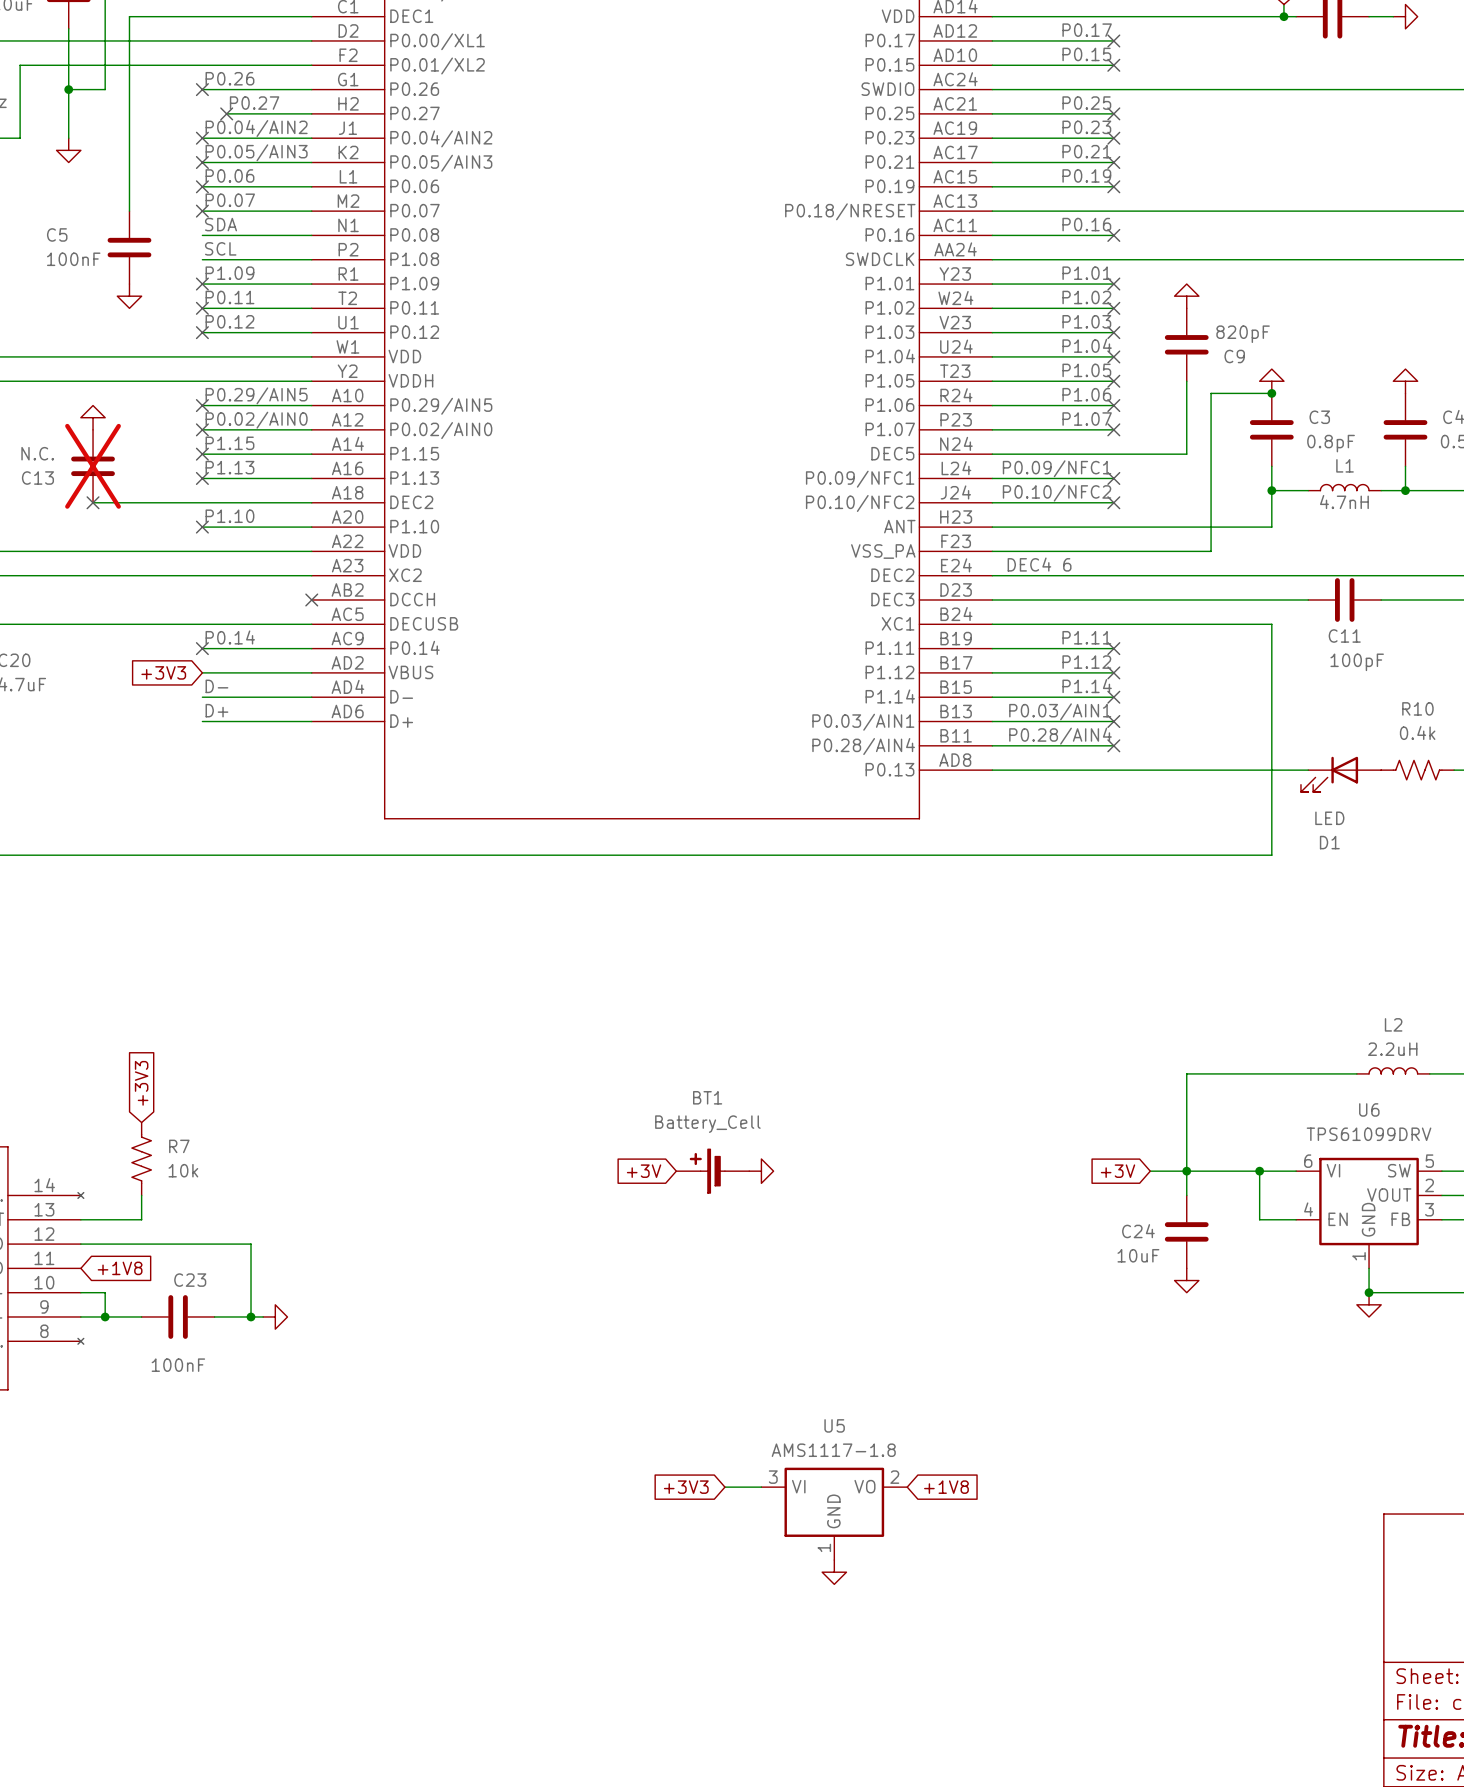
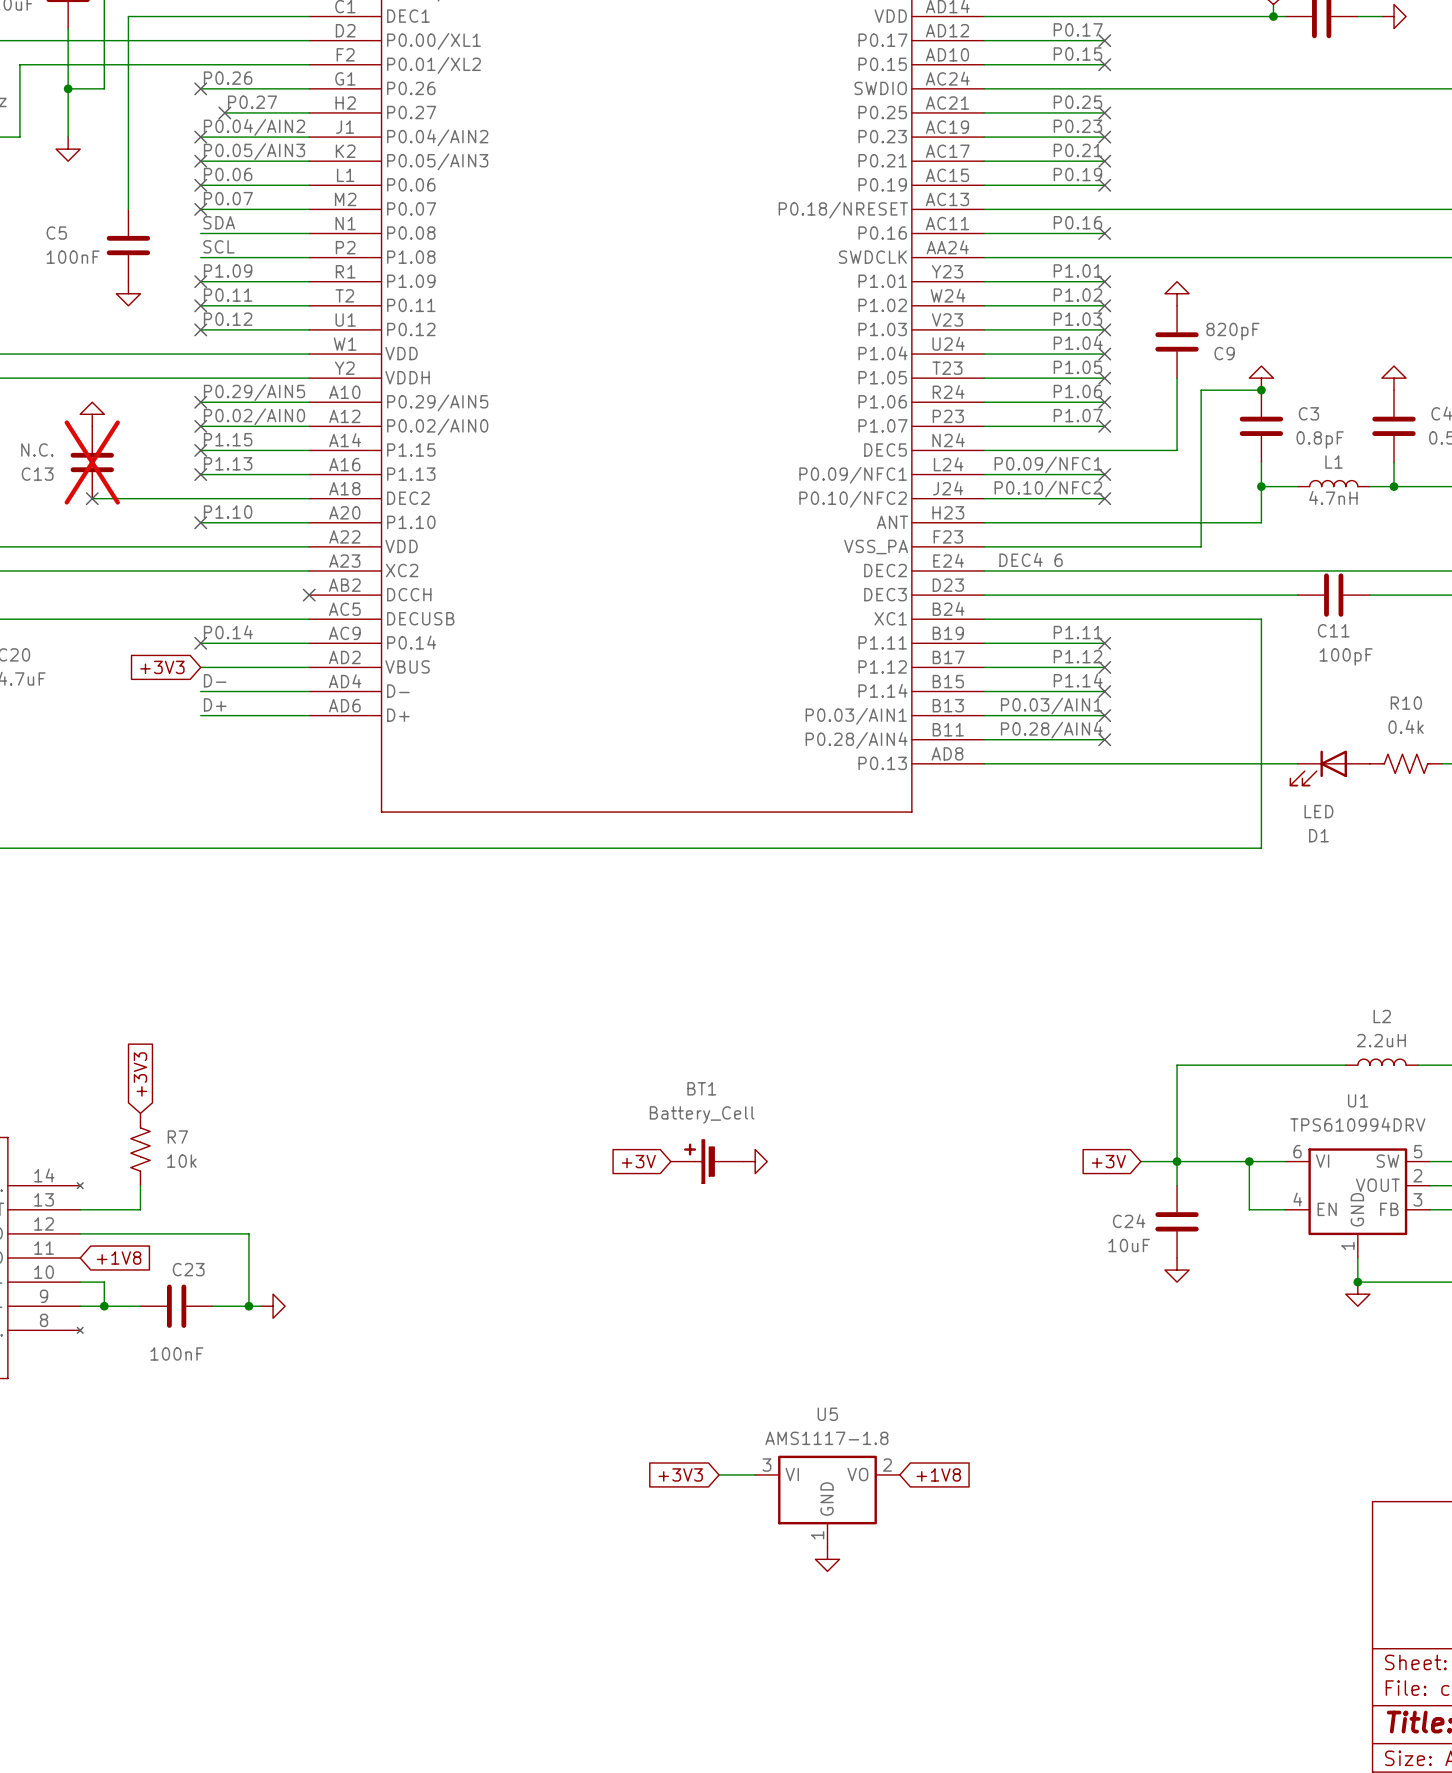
U6 name: U6 (1369, 1109) -> U1 (1358, 1100)
U6 value: TPS61099DRV (1369, 1134) -> TPS610994DRV (1357, 1124)

